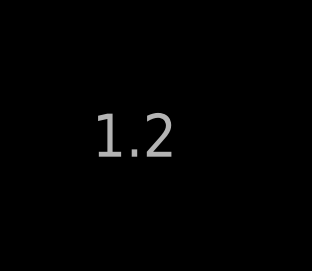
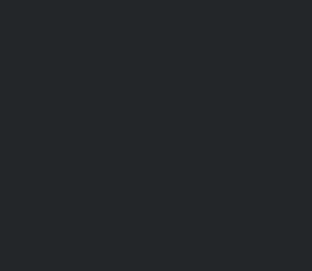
text: 1.2 (134, 134) -> none

